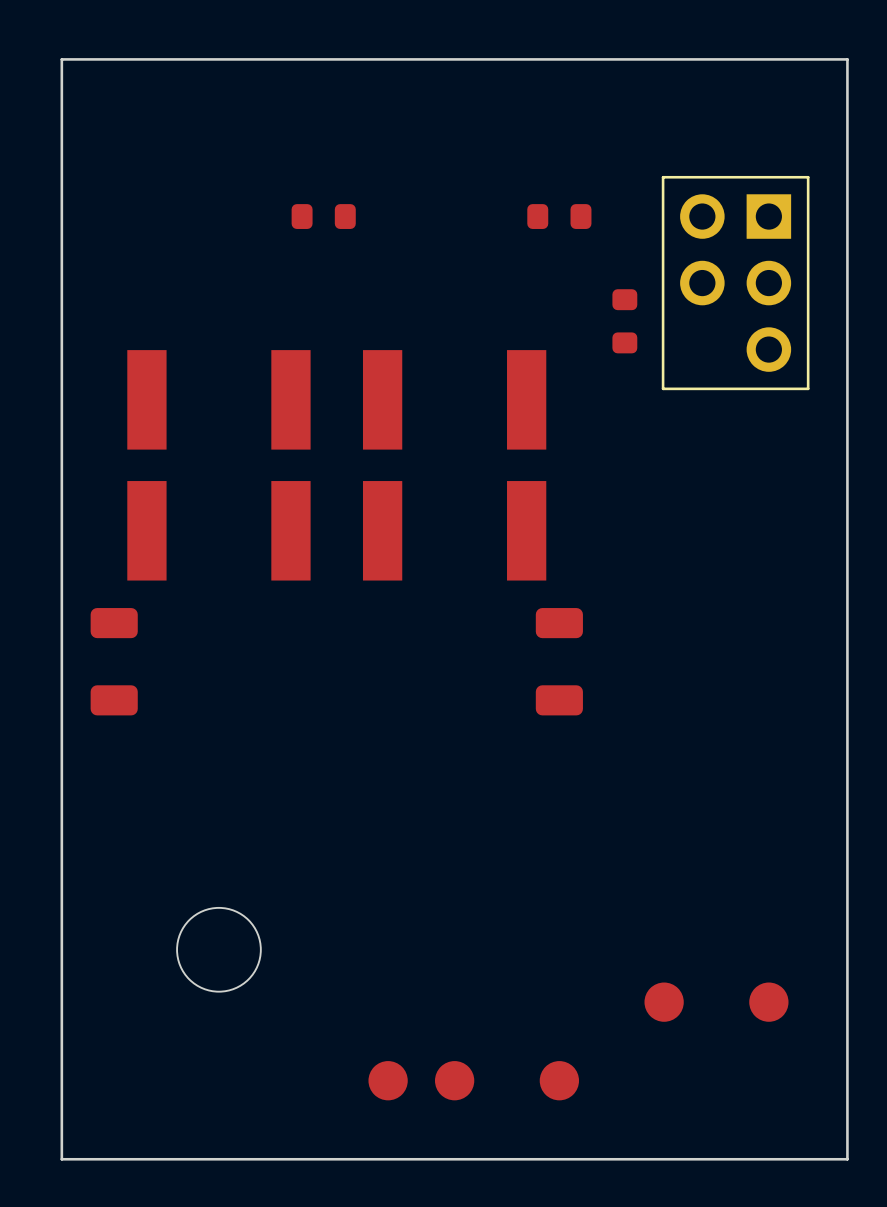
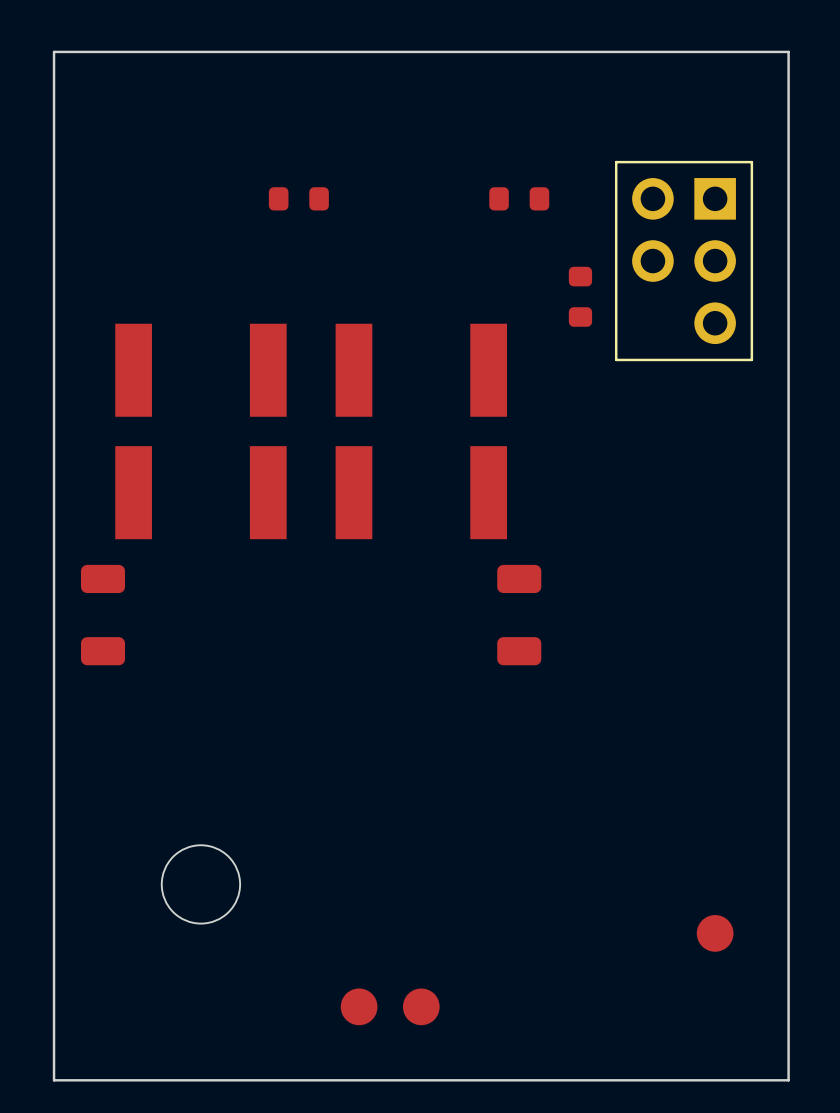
part: (664, 1002) -> none
part: (559, 1080) -> none

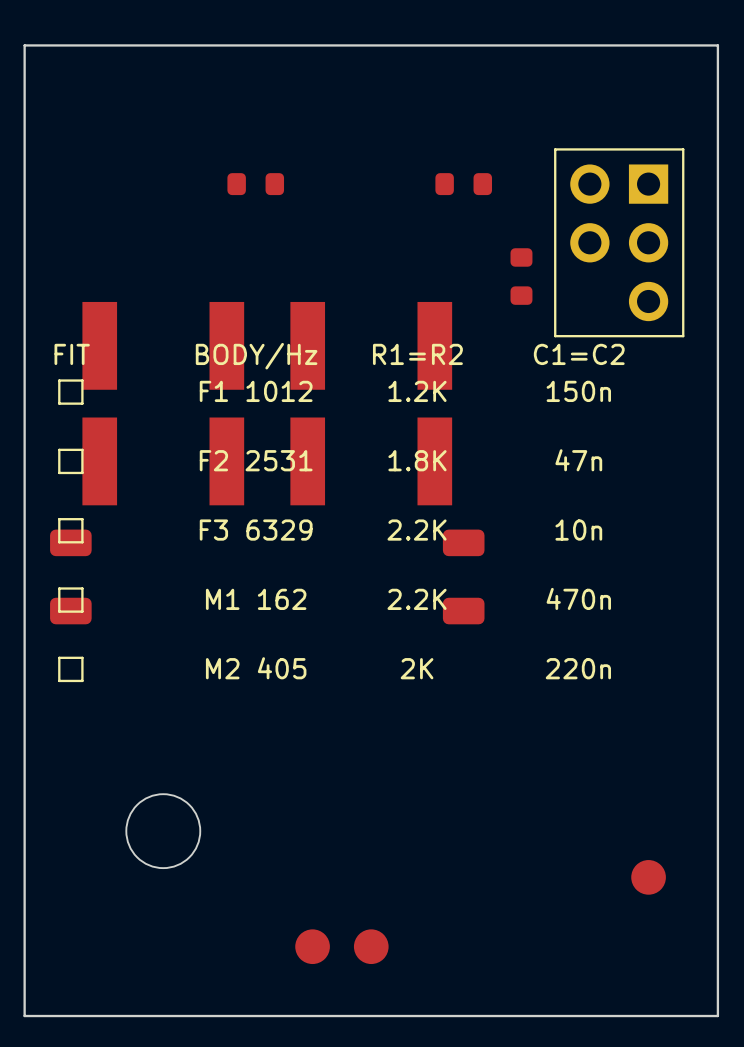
text: none -> FIT (72, 354)
text: none -> R1=R2 (417, 354)
text: none -> C1=C2 (579, 354)
text: none -> BODY/Hz (256, 356)
line: none -> (82, 380) (82, 403) (59, 403) (59, 380) (82, 380)
text: none -> F1 1012 (256, 391)
text: none -> 1.2K (417, 391)
text: none -> 150n (578, 391)
line: none -> (82, 449) (82, 472) (59, 472) (59, 449) (82, 449)
text: none -> F2 2531 (256, 460)
text: none -> 1.8K (417, 460)
text: none -> 47n (578, 460)
line: none -> (82, 519) (82, 542) (59, 542) (59, 519) (82, 519)
text: none -> F3 6329 (256, 530)
text: none -> 2.2K (417, 530)
text: none -> 10n (578, 530)
line: none -> (82, 588) (82, 611) (59, 611) (59, 588) (82, 588)
text: none -> M1 162 (256, 599)
text: none -> 2.2K (417, 599)
text: none -> 470n (578, 598)
line: none -> (82, 657) (82, 680) (59, 680) (59, 657) (82, 657)
text: none -> M2 405 (256, 668)
text: none -> 2K (417, 668)
text: none -> 220n (578, 668)

